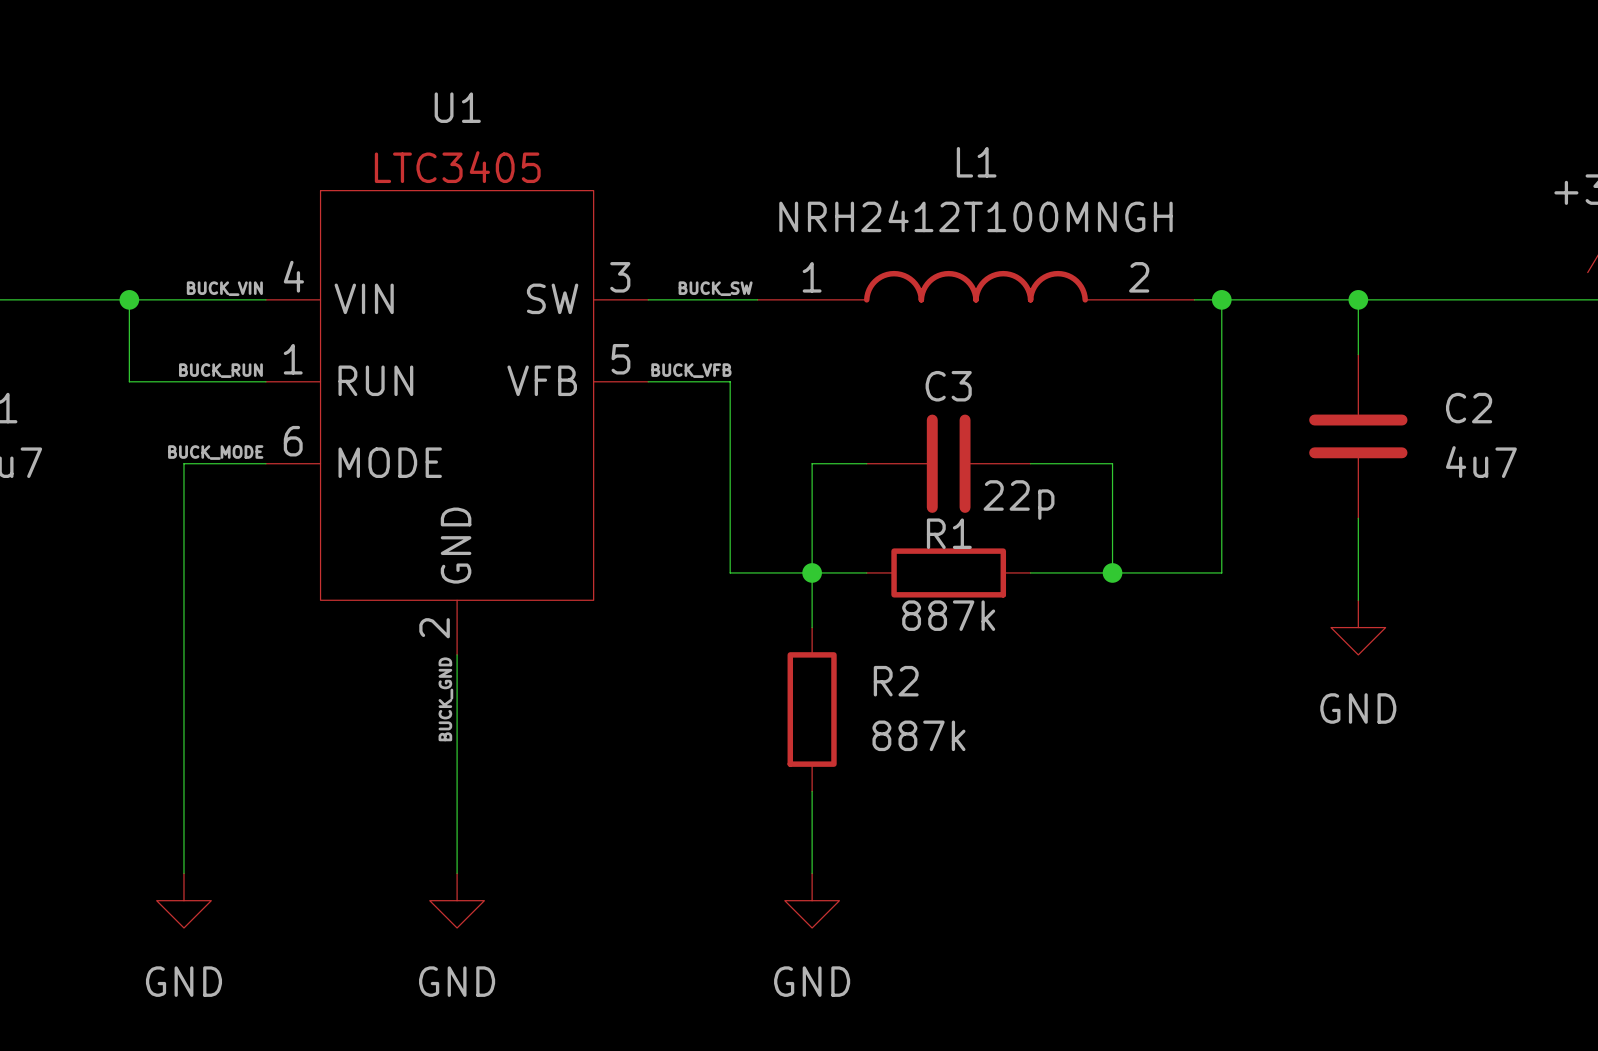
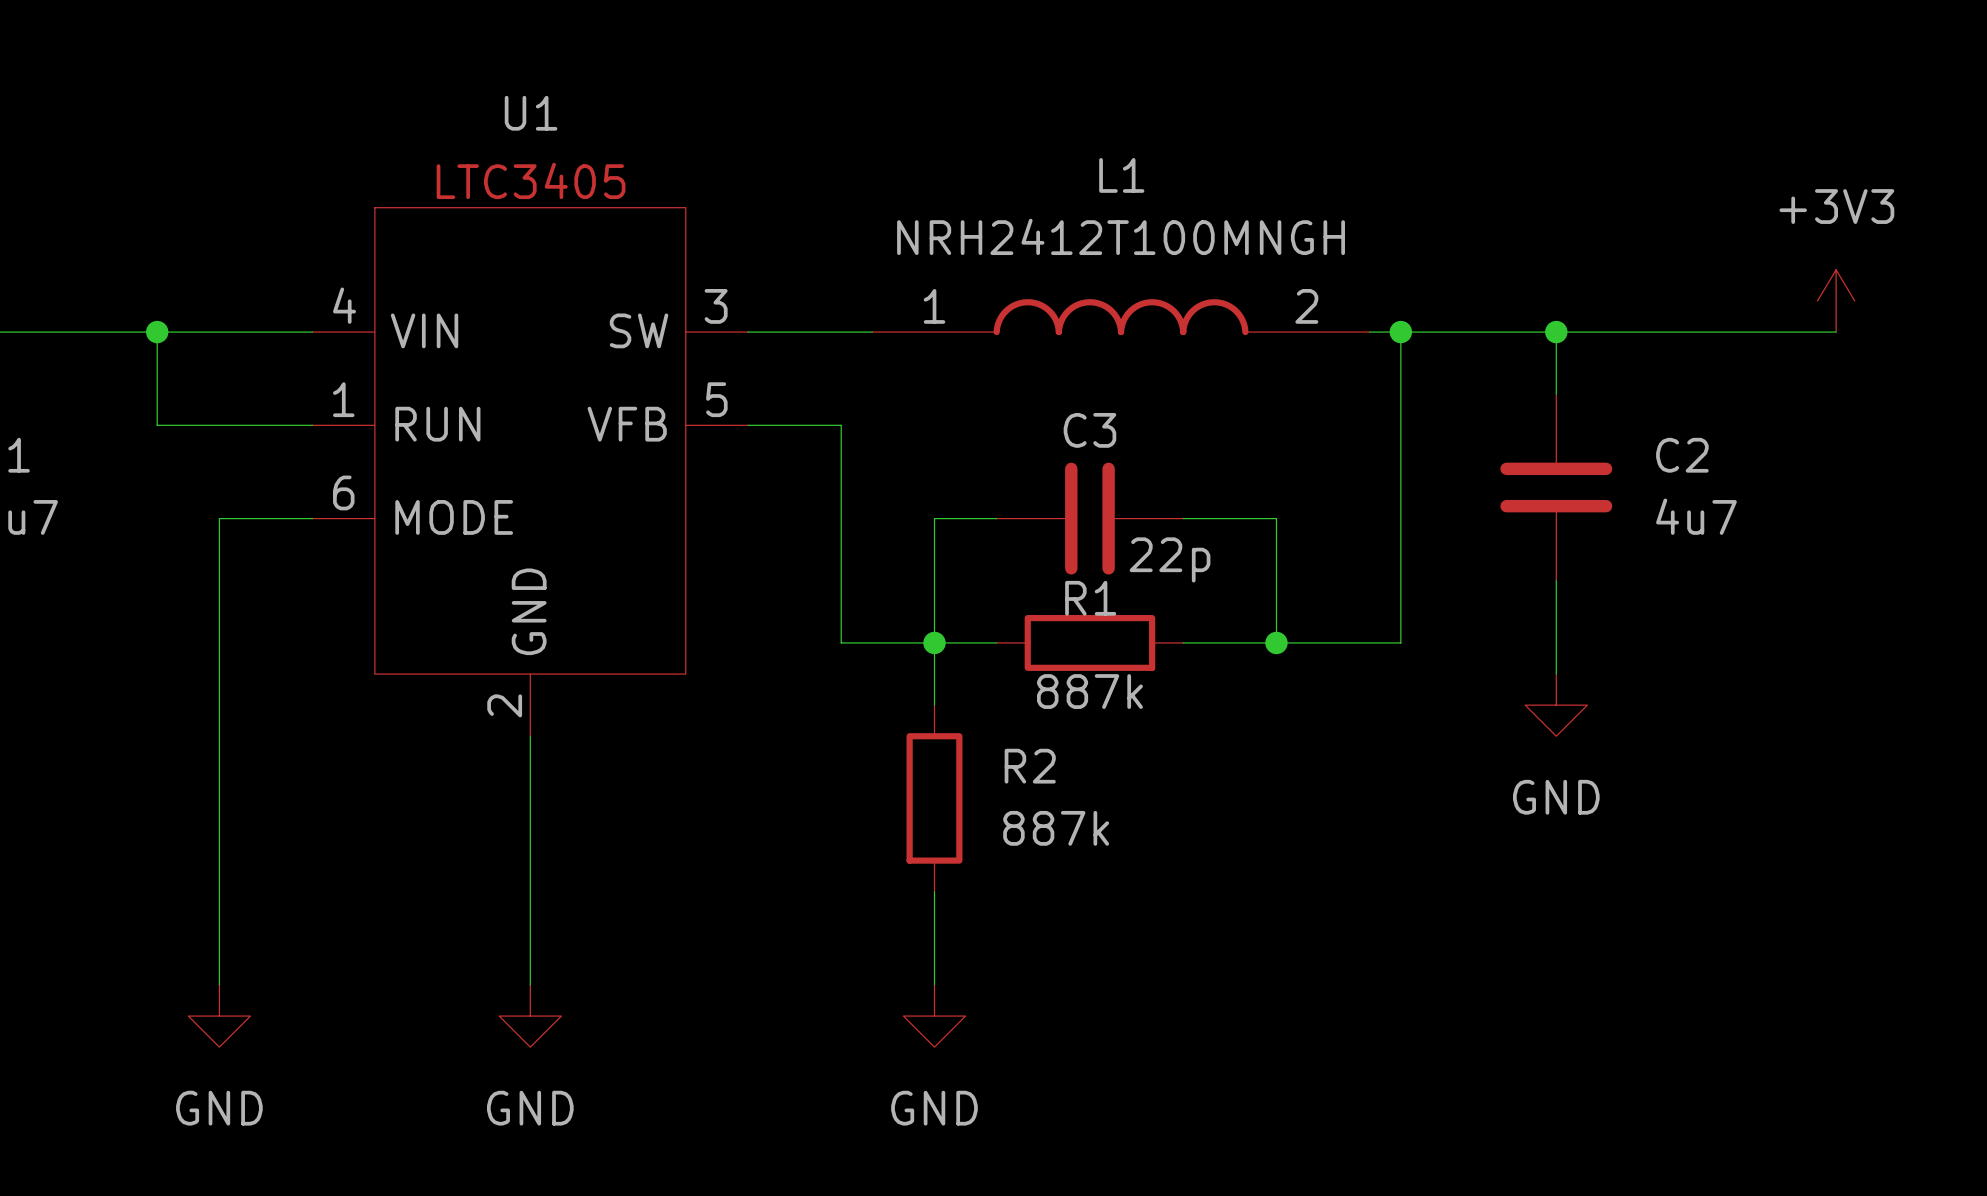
label: BUCK_VIN (224, 288) -> none
label: BUCK_SW (715, 288) -> none
label: BUCK_RUN (220, 370) -> none
label: BUCK_VFB (691, 370) -> none
label: BUCK_MODE (215, 452) -> none
label: BUCK_GND (445, 699) -> none

